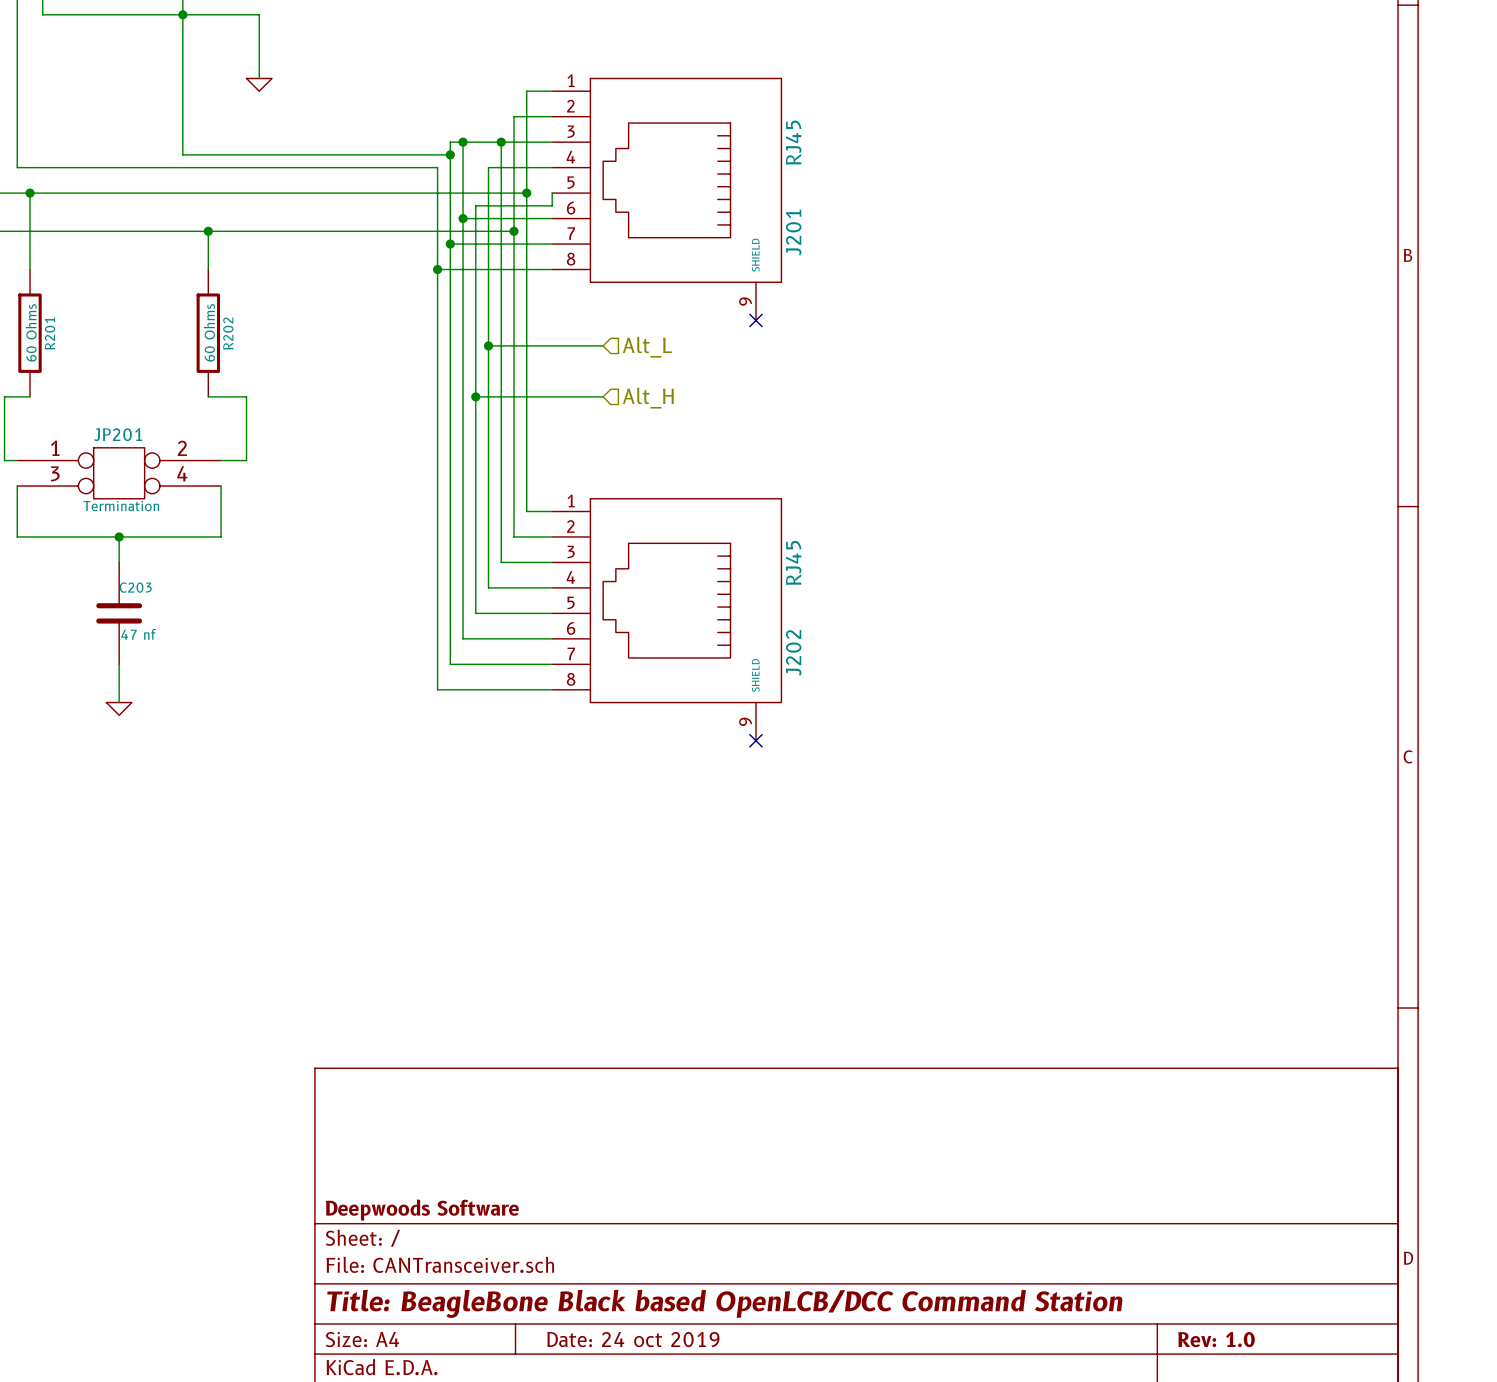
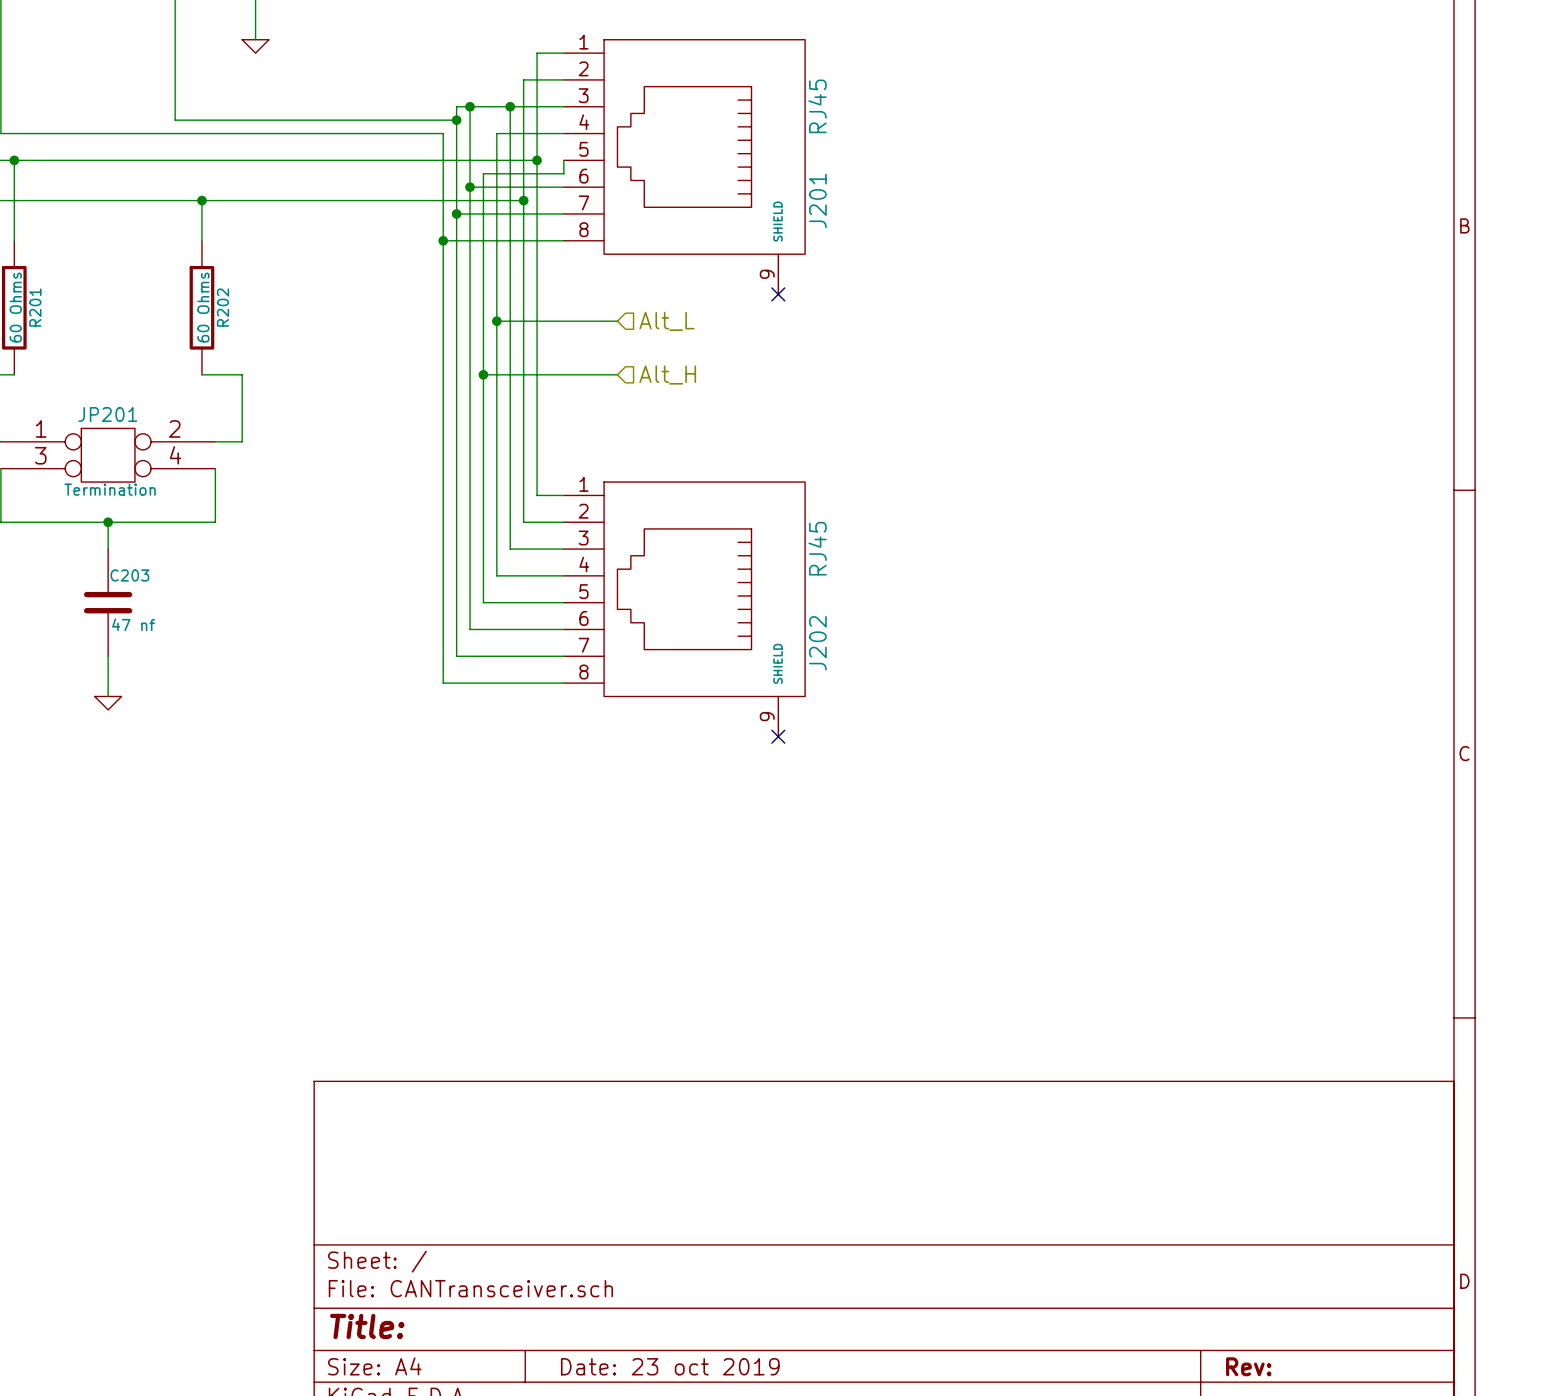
title block: Deepwoods Software (422, 1210) -> none
title block: Title: BeagleBone Black based OpenLCB/DCC Command Station (724, 1303) -> Title: (367, 1326)
title block: Date: 24 oct 2019 (633, 1339) -> Date: 23 oct 2019 (670, 1366)
title block: Rev: 1.0 (1216, 1339) -> Rev: (1248, 1366)

